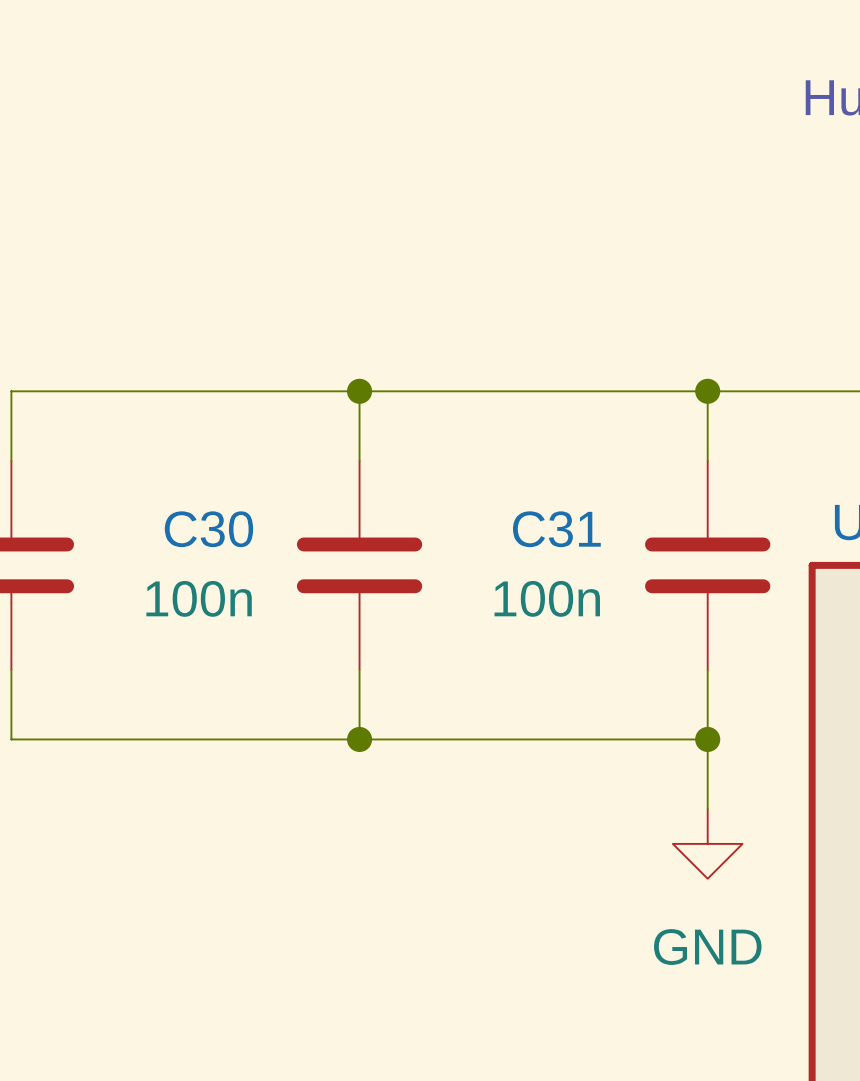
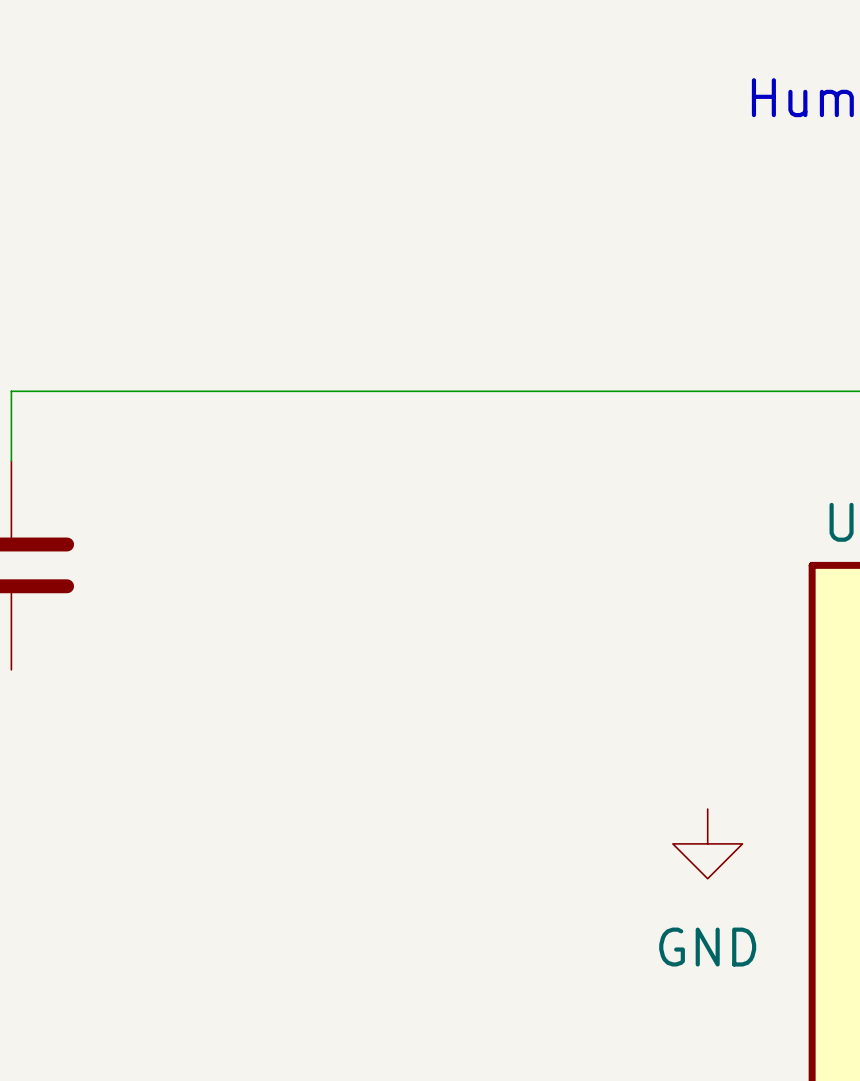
wire: (359, 391) (359, 460) -> none
junction: (359, 391) -> none
wire: (707, 391) (707, 460) -> none
junction: (707, 391) -> none
C30: 100n (359, 565) -> none
C31: 100n (707, 565) -> none
wire: (11, 669) (11, 739) (707, 739) -> none
wire: (359, 669) (359, 739) -> none
wire: (707, 669) (707, 809) -> none
junction: (359, 739) -> none
junction: (707, 739) -> none

